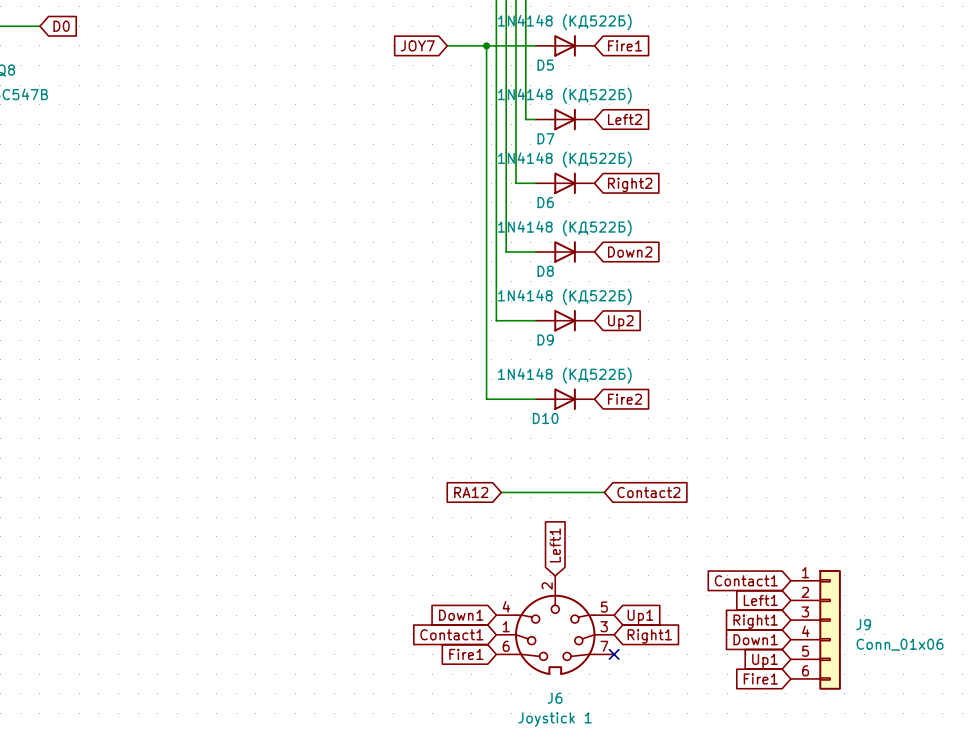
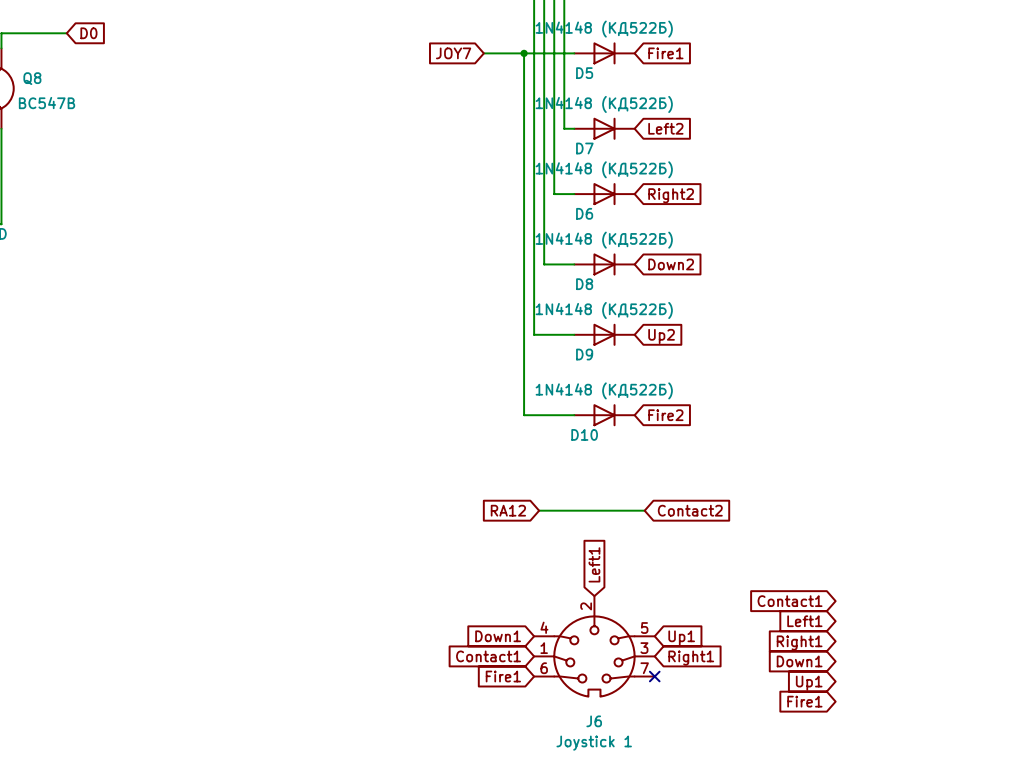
J9: Conn_01x06 (815, 629) -> none

